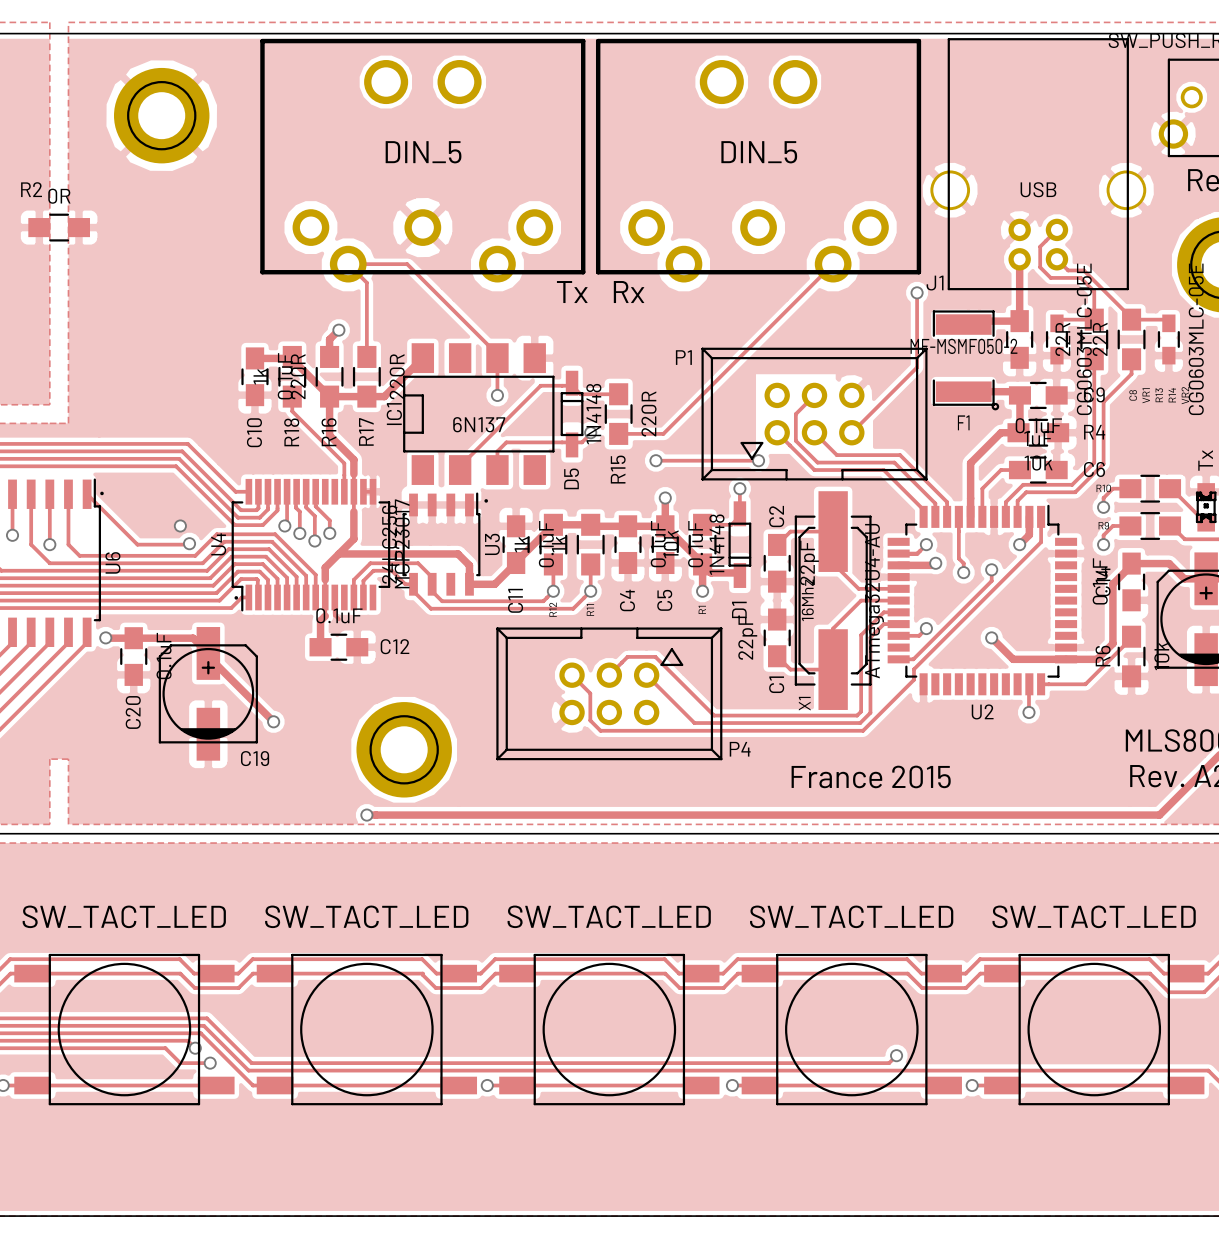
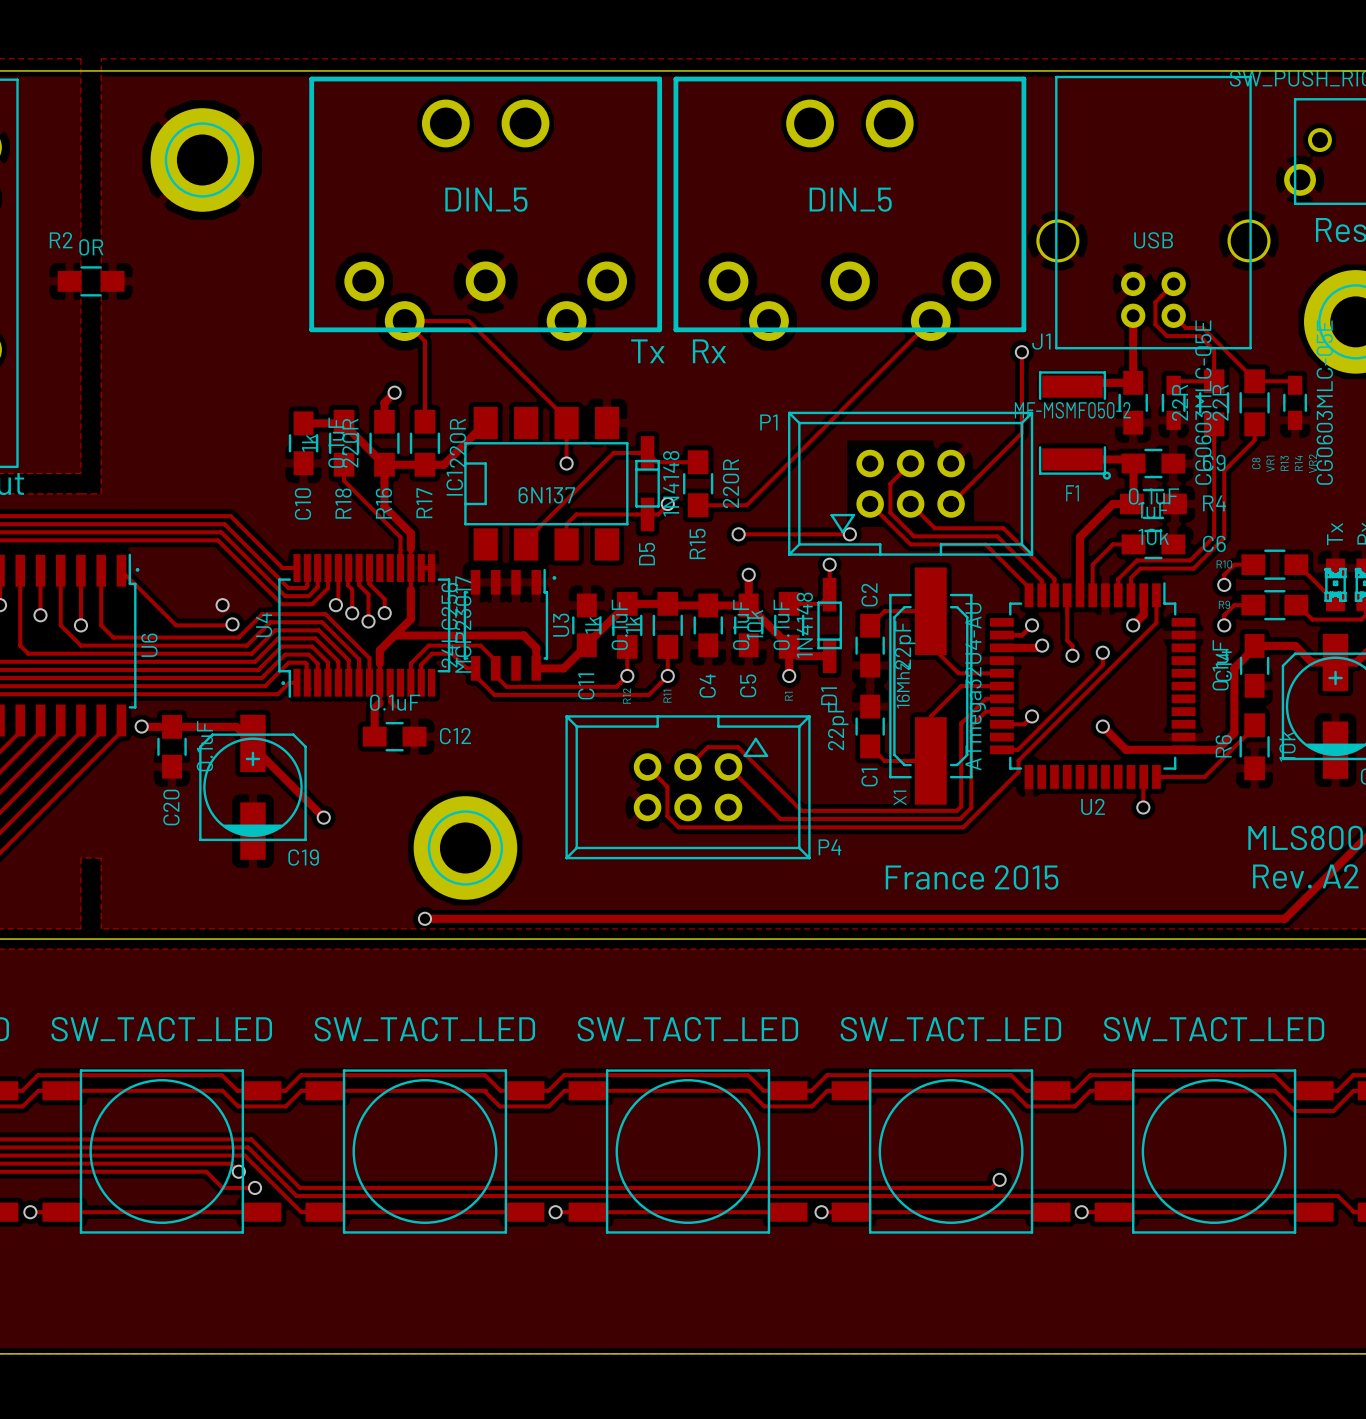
D5 footprint: [560, 370, 584, 458] -> [635, 436, 660, 532]
D1 footprint: [728, 501, 752, 588] -> [817, 577, 843, 674]

